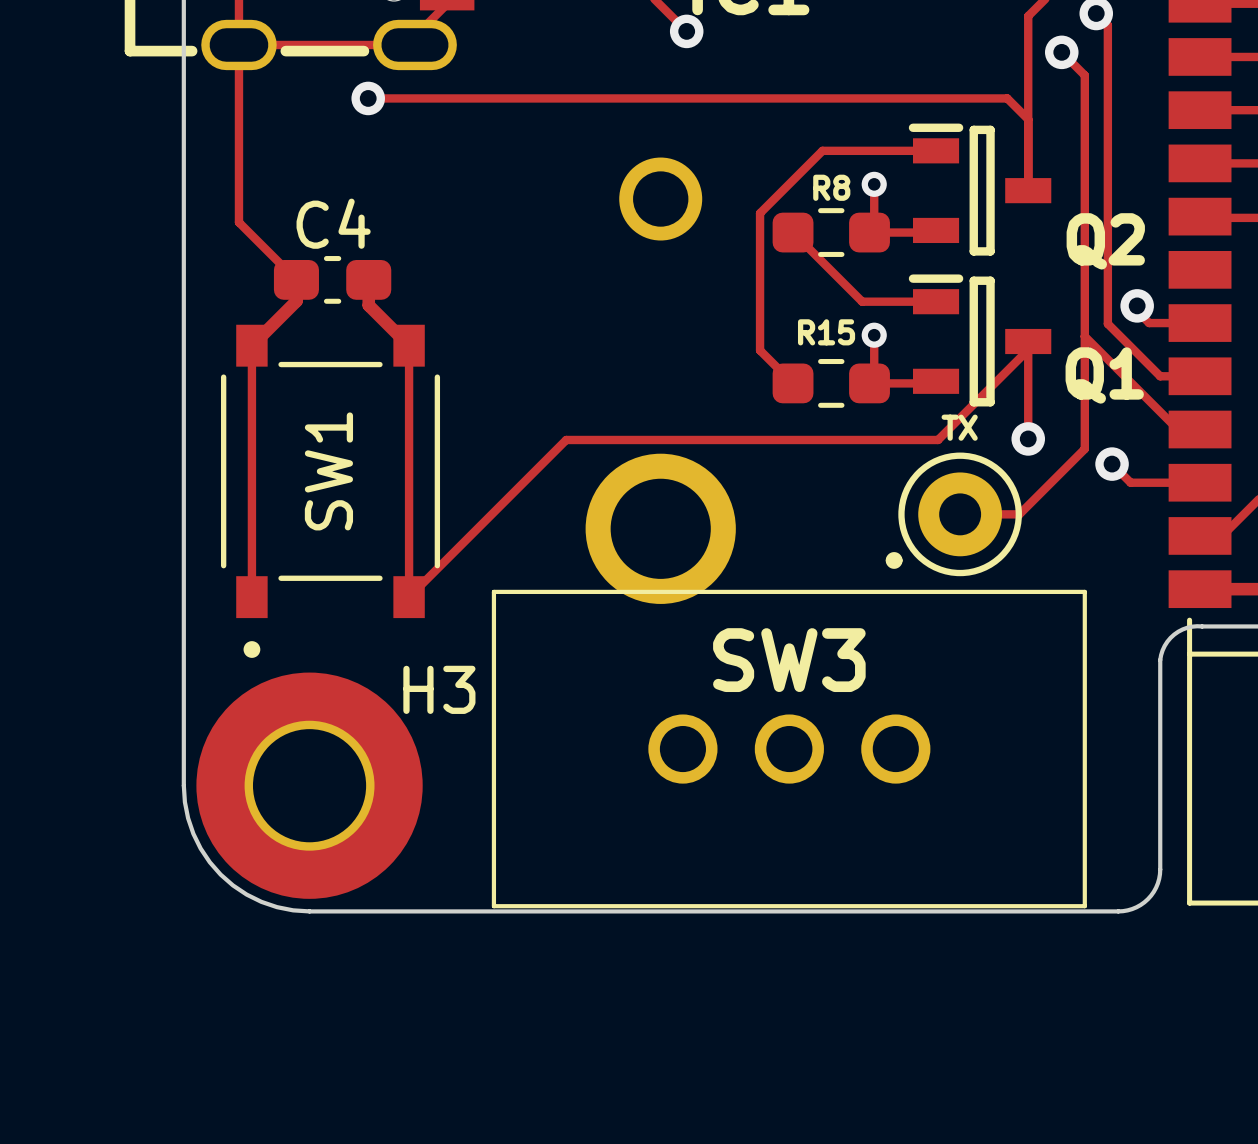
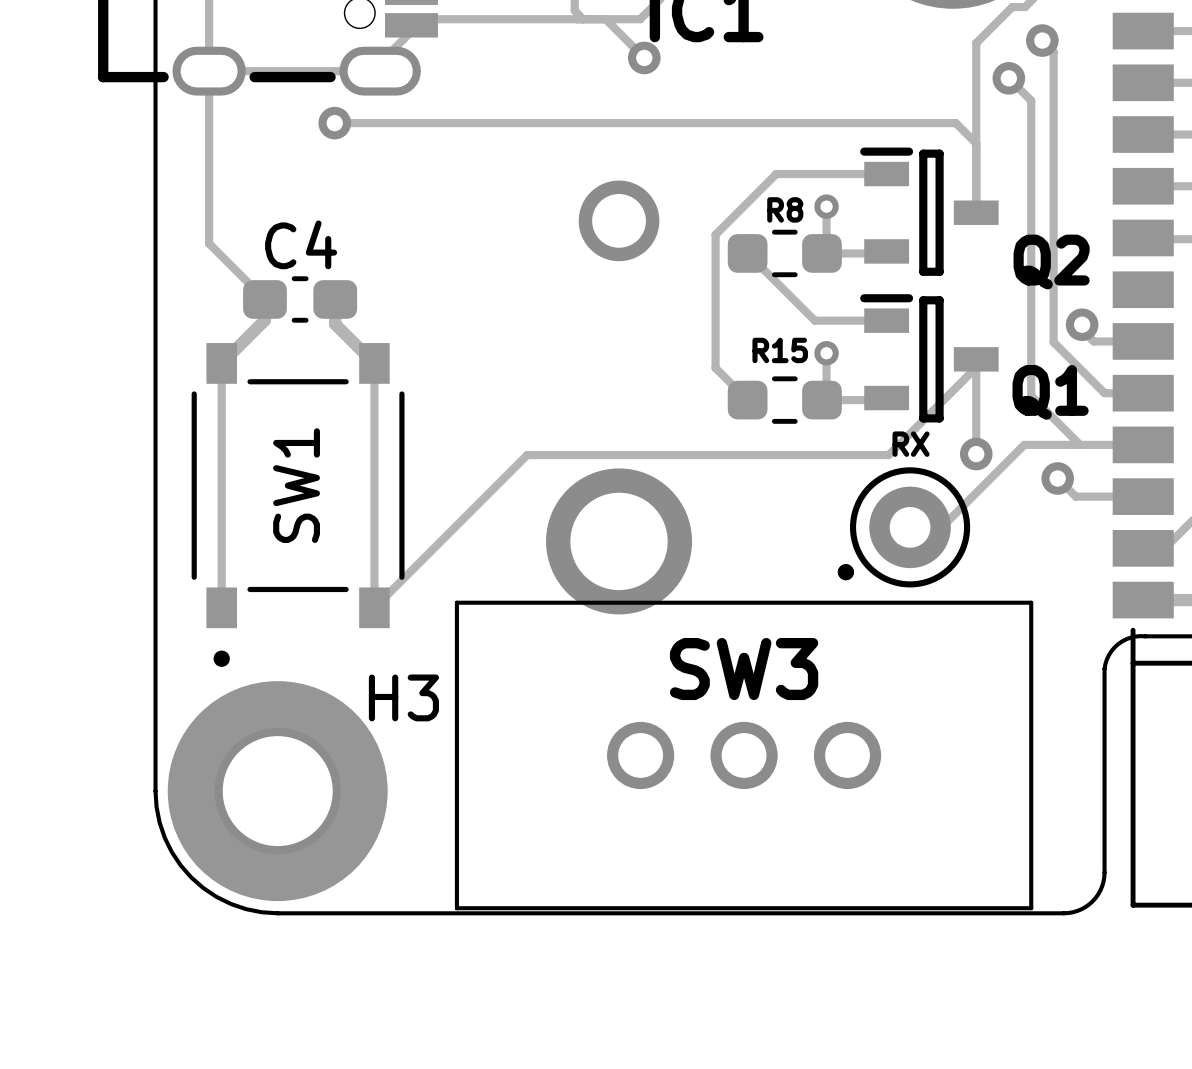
track: (1084, 336) (1177, 429) -> (913, 526) (942, 526) (1024, 444) (1121, 444)
track: (1084, 379) (1084, 448) (1019, 514) (960, 514) -> (1031, 396) (1080, 444)
part value: TX (959, 427) -> RX (911, 444)

